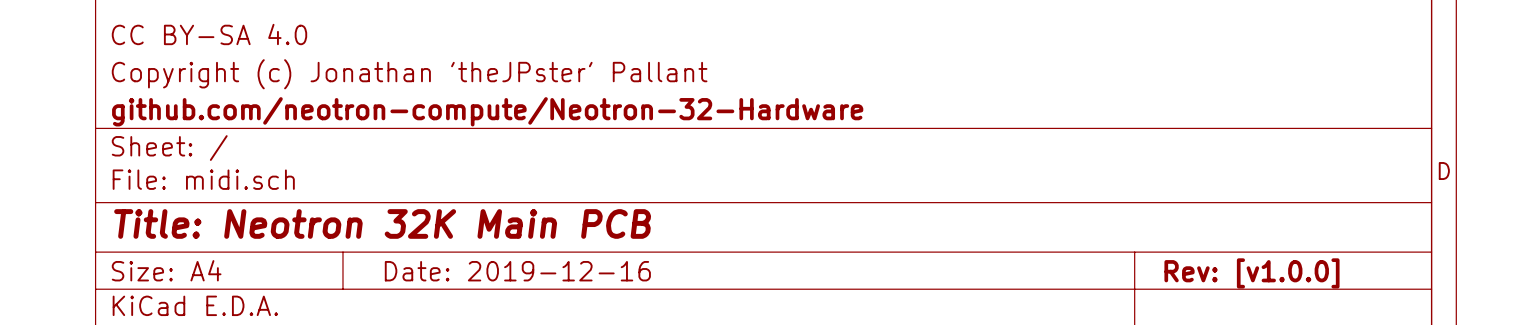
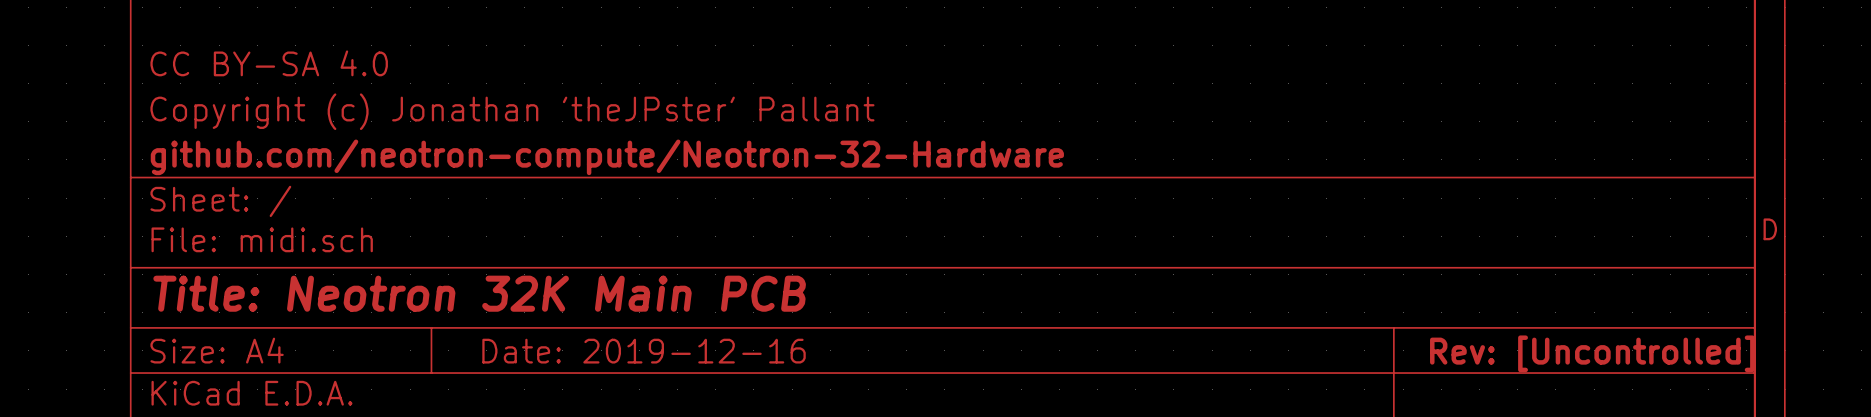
title block: Rev: [v1.0.0] (1251, 273) -> Rev: [Uncontrolled] (1592, 353)

